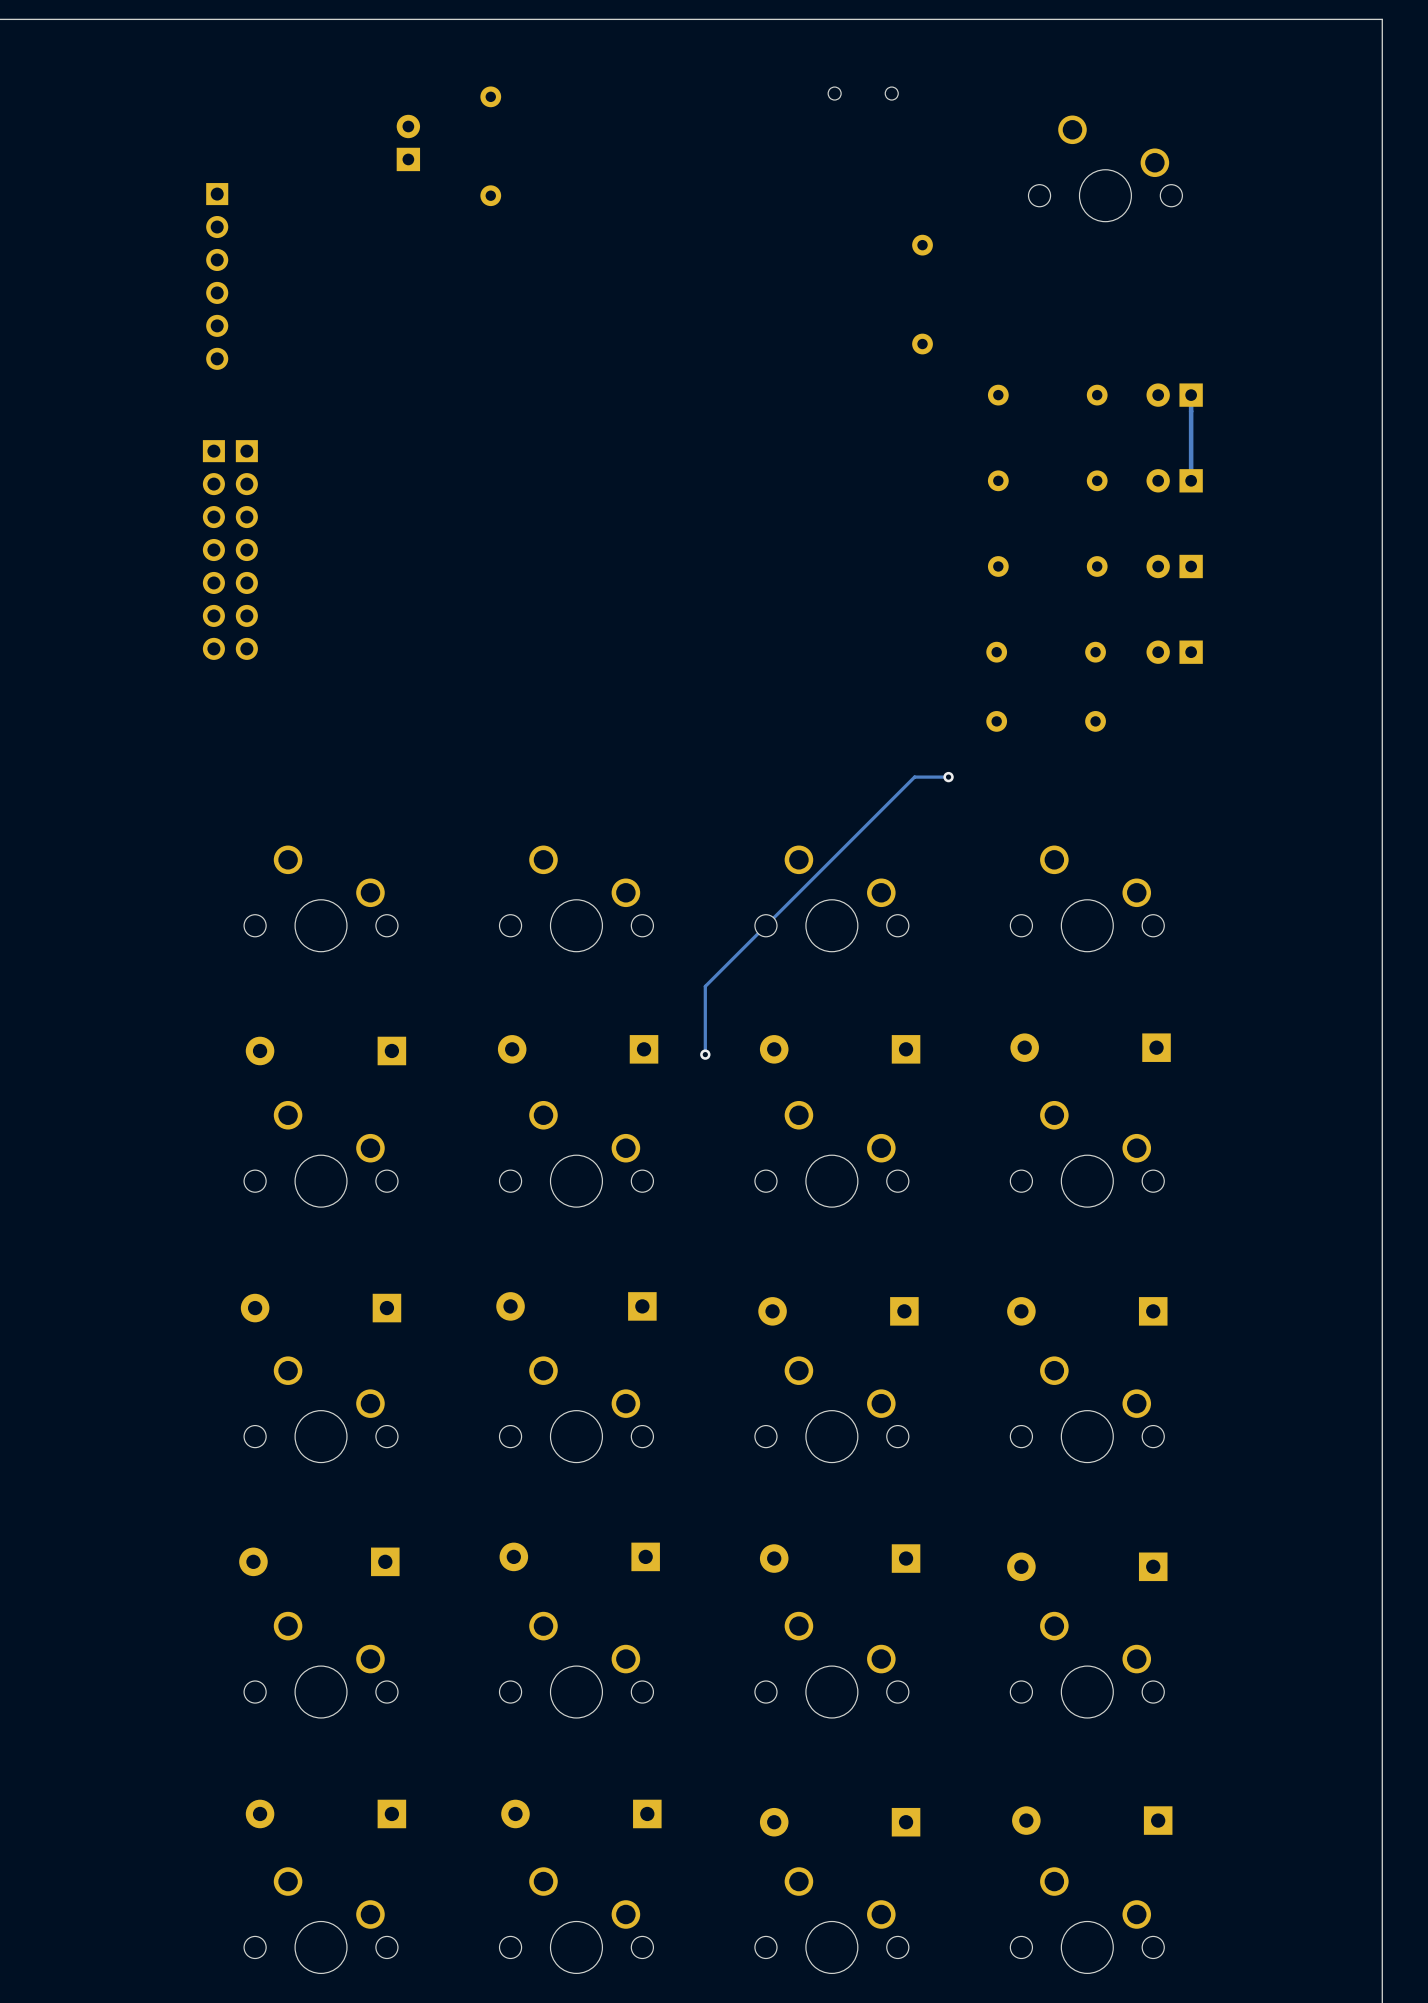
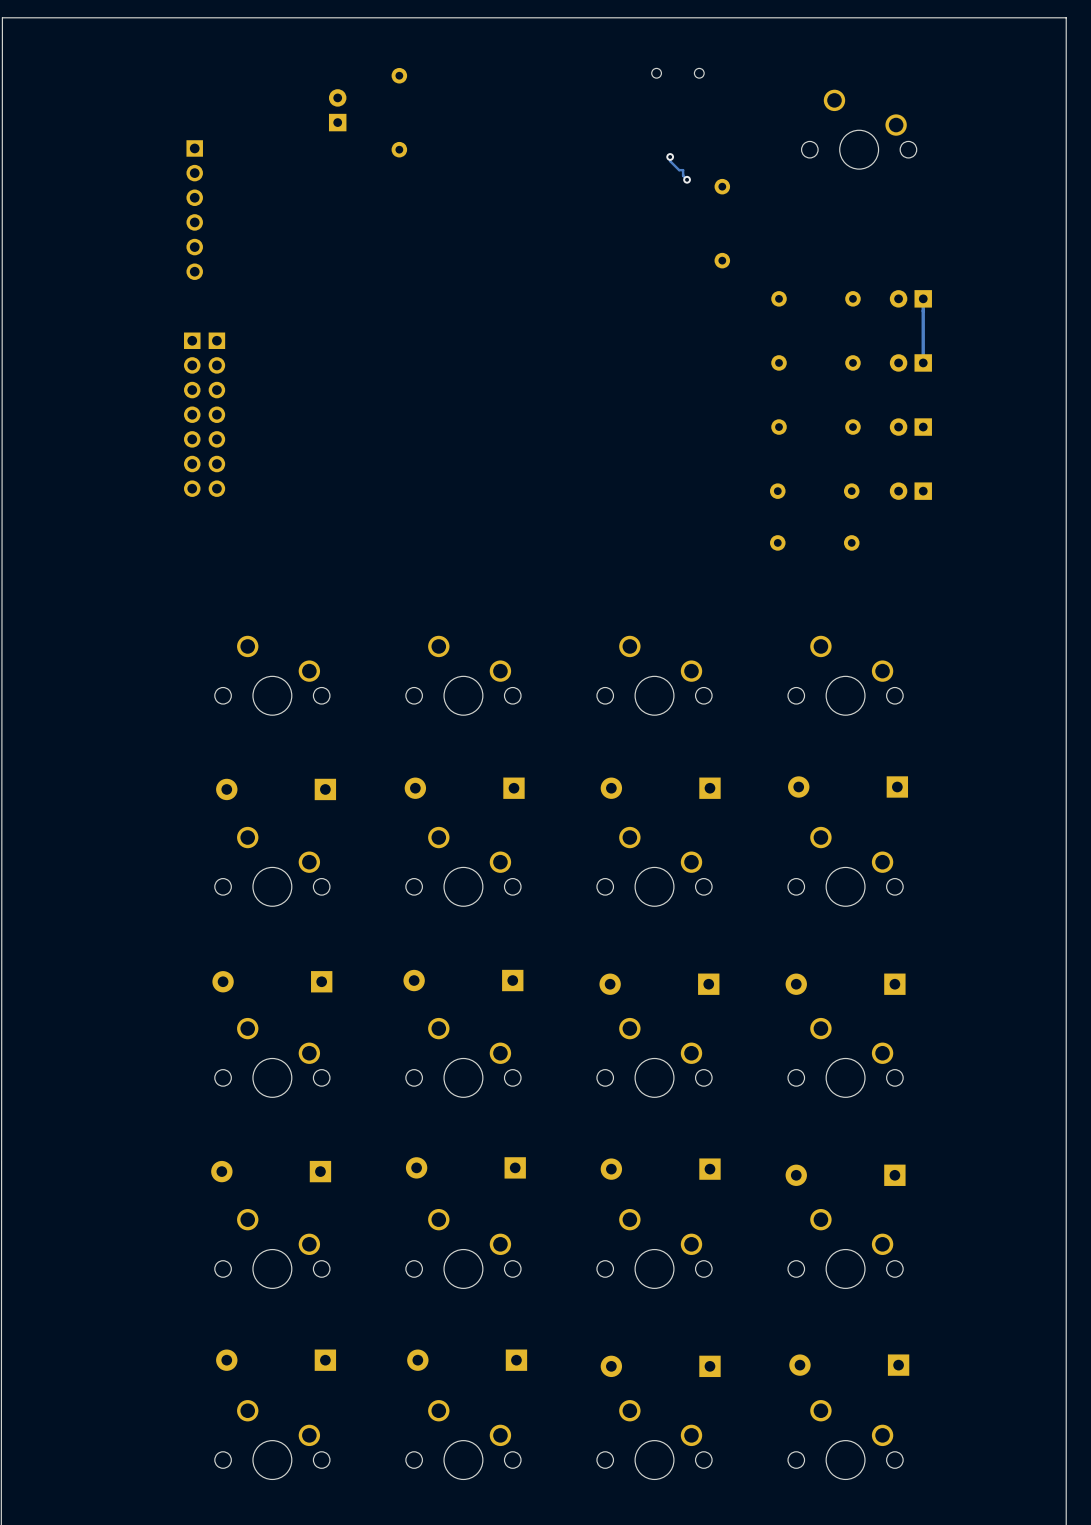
track: none -> (670, 157) (670, 161) (679, 170) (683, 170) (683, 175) (687, 179)
via: none -> (670, 156)
via: none -> (687, 179)
track: (948, 777) (914, 777) (705, 986) (705, 1054) -> none
via: (948, 777) -> none
via: (705, 1054) -> none

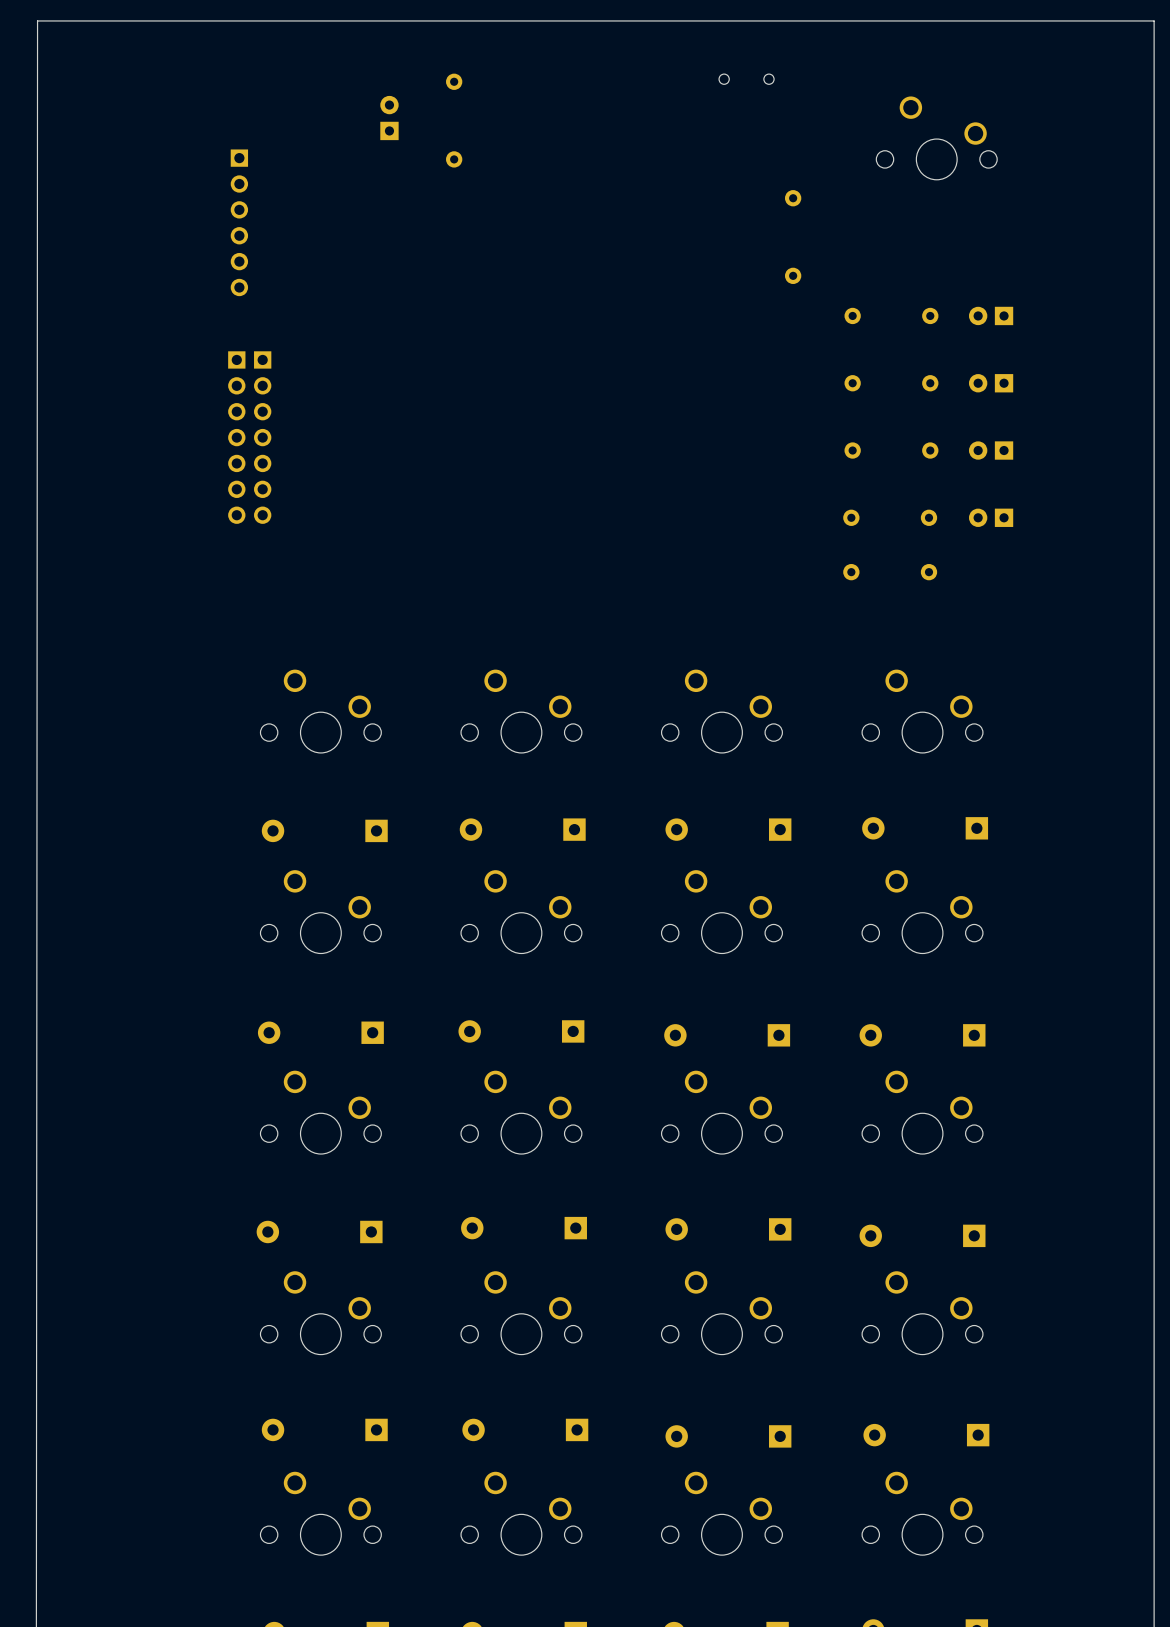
via: (670, 156) -> none
track: (670, 157) (670, 161) (679, 170) (683, 170) (683, 175) (687, 179) -> none
via: (687, 179) -> none
track: (923, 298) (923, 362) -> none

